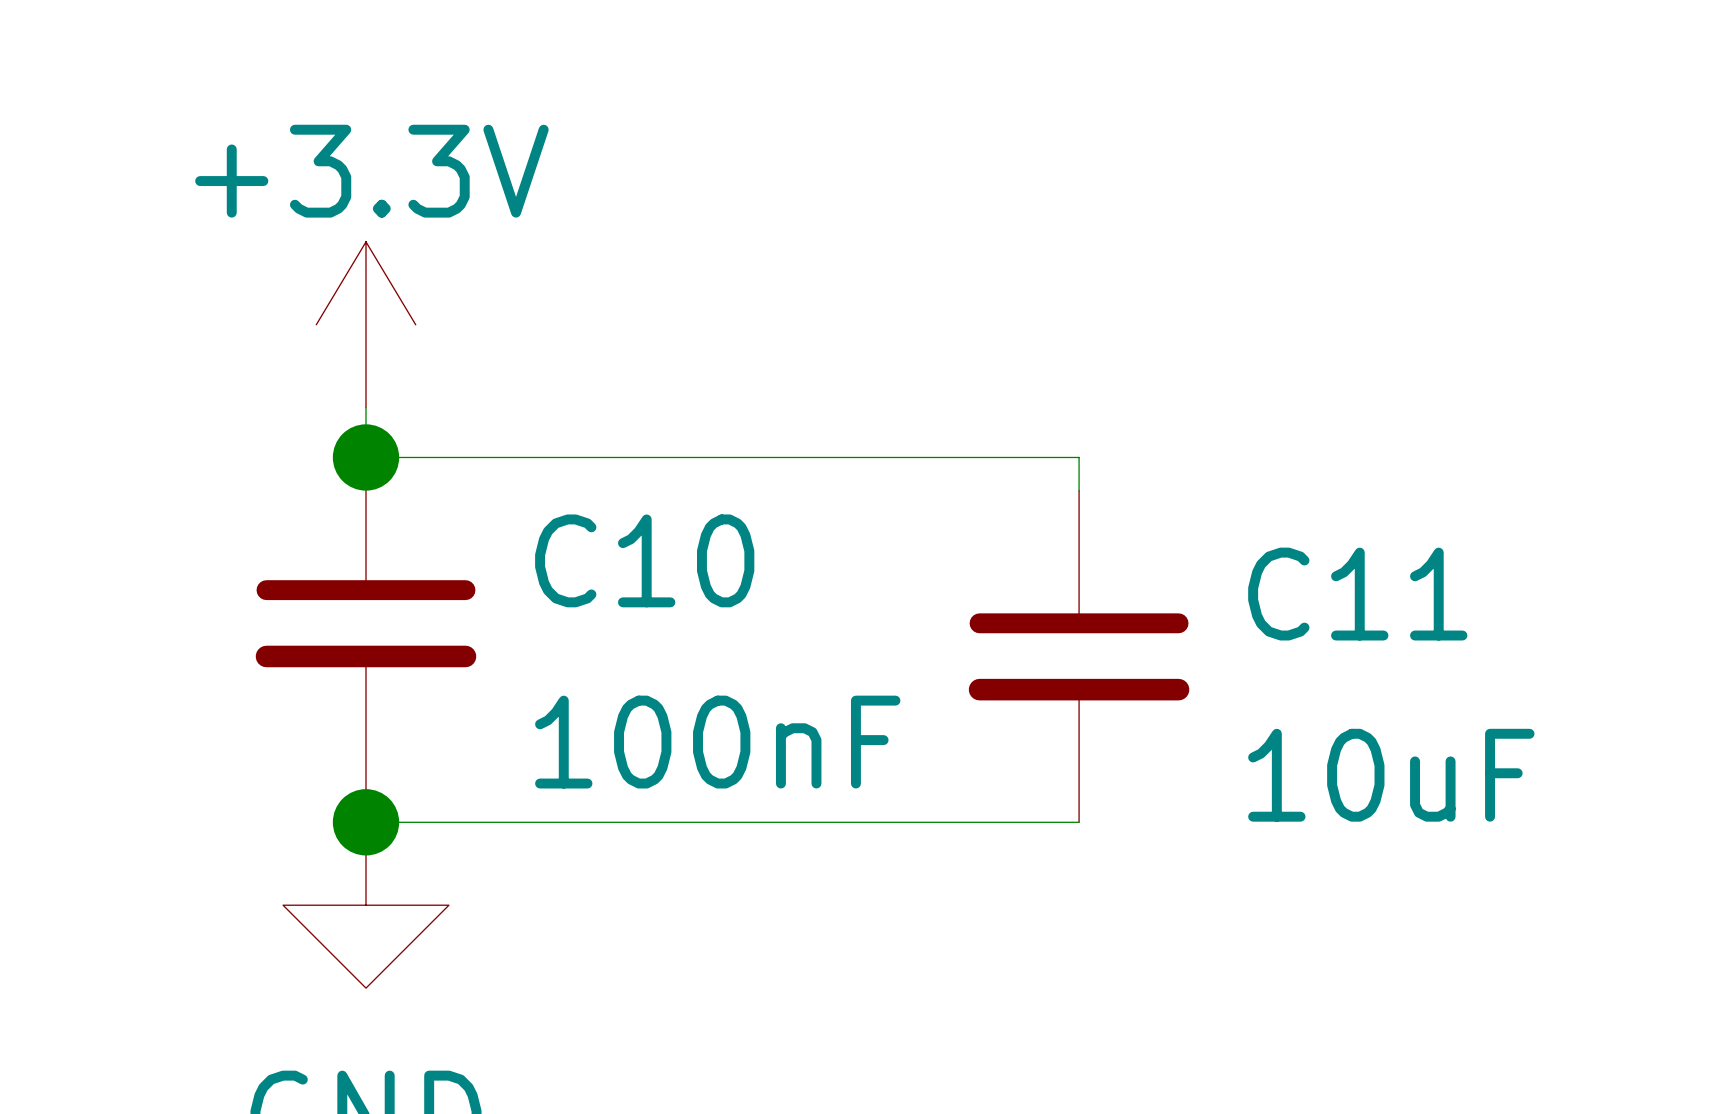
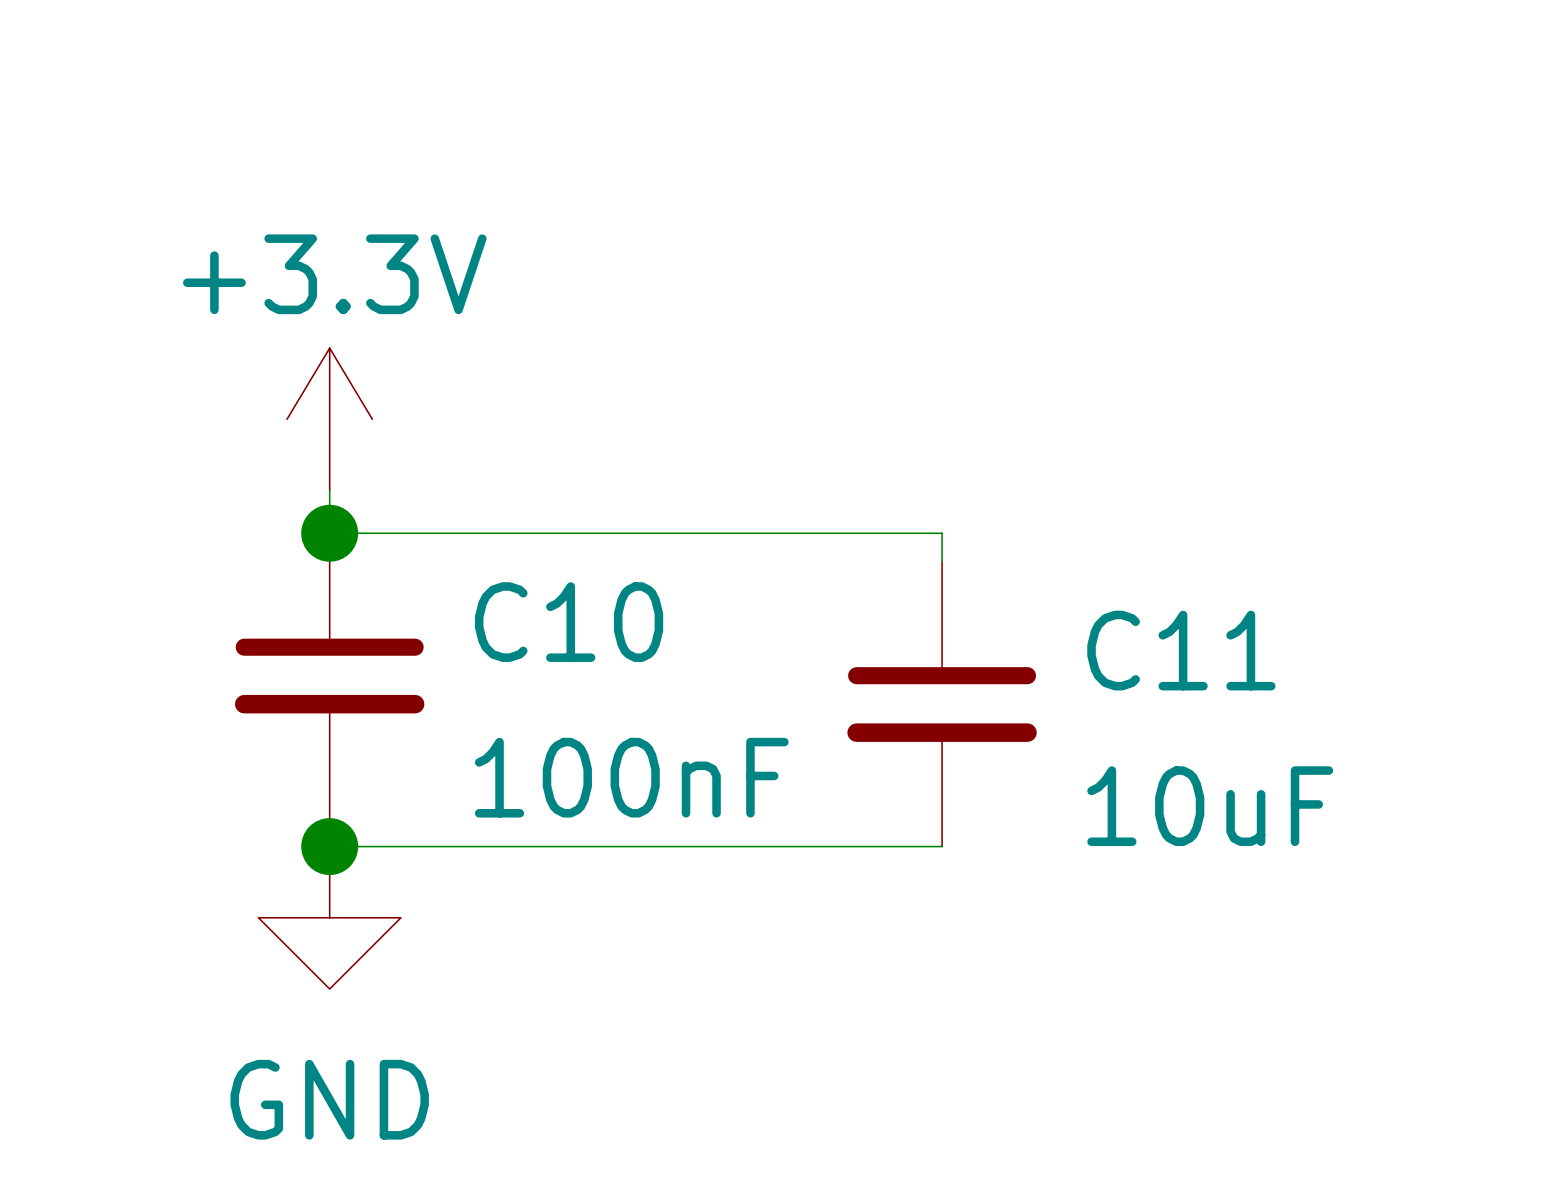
power symbol text position: +3.3V (371, 171) -> +3.3V (334, 274)

